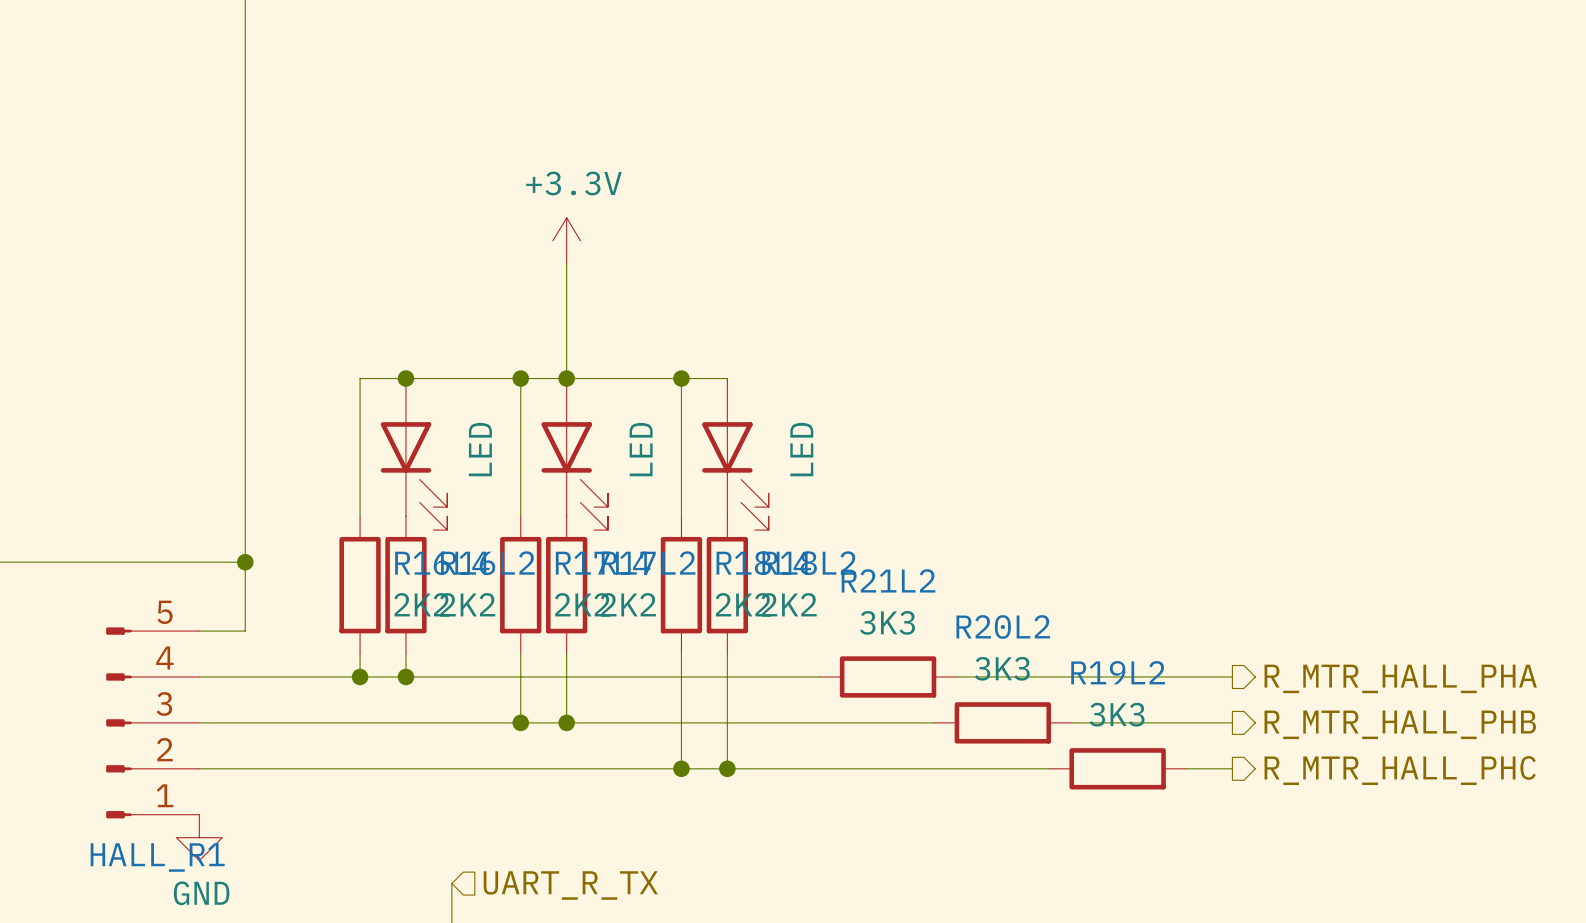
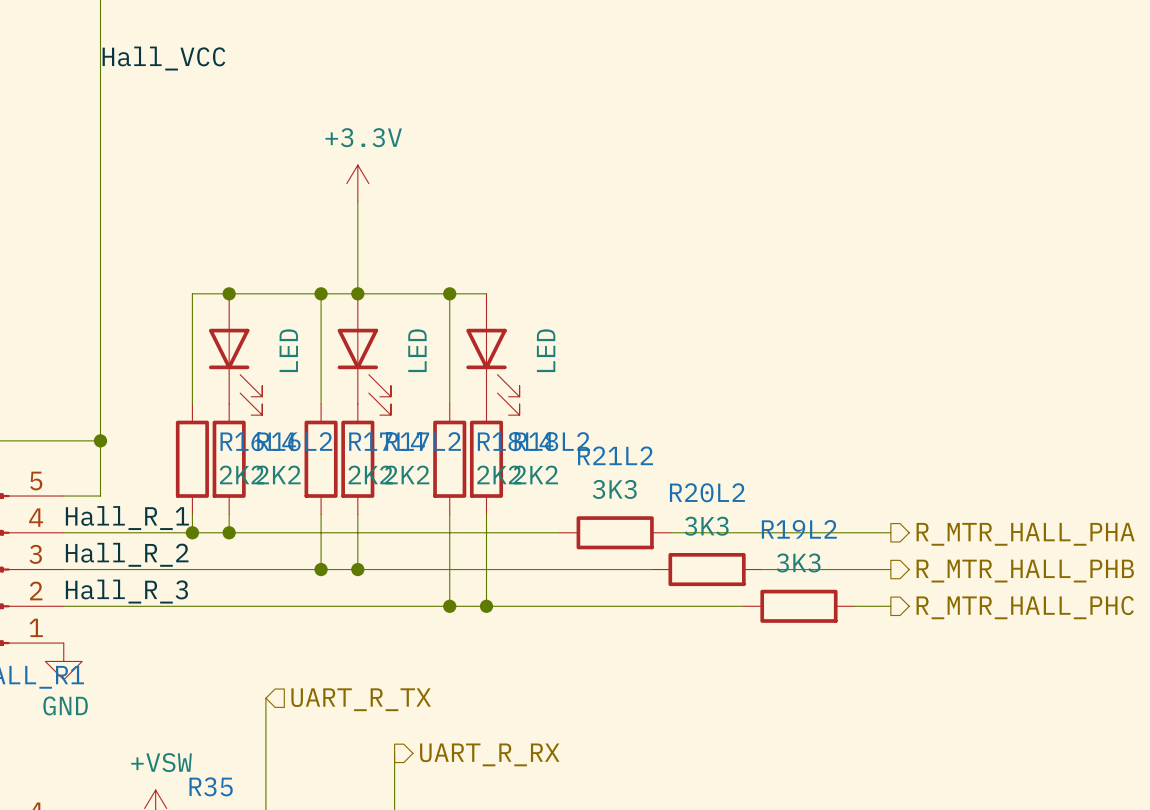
label: none -> Hall_VCC (163, 58)
label: none -> Hall_R_1 (127, 518)
label: none -> Hall_R_2 (127, 554)
label: none -> Hall_R_3 (126, 591)

